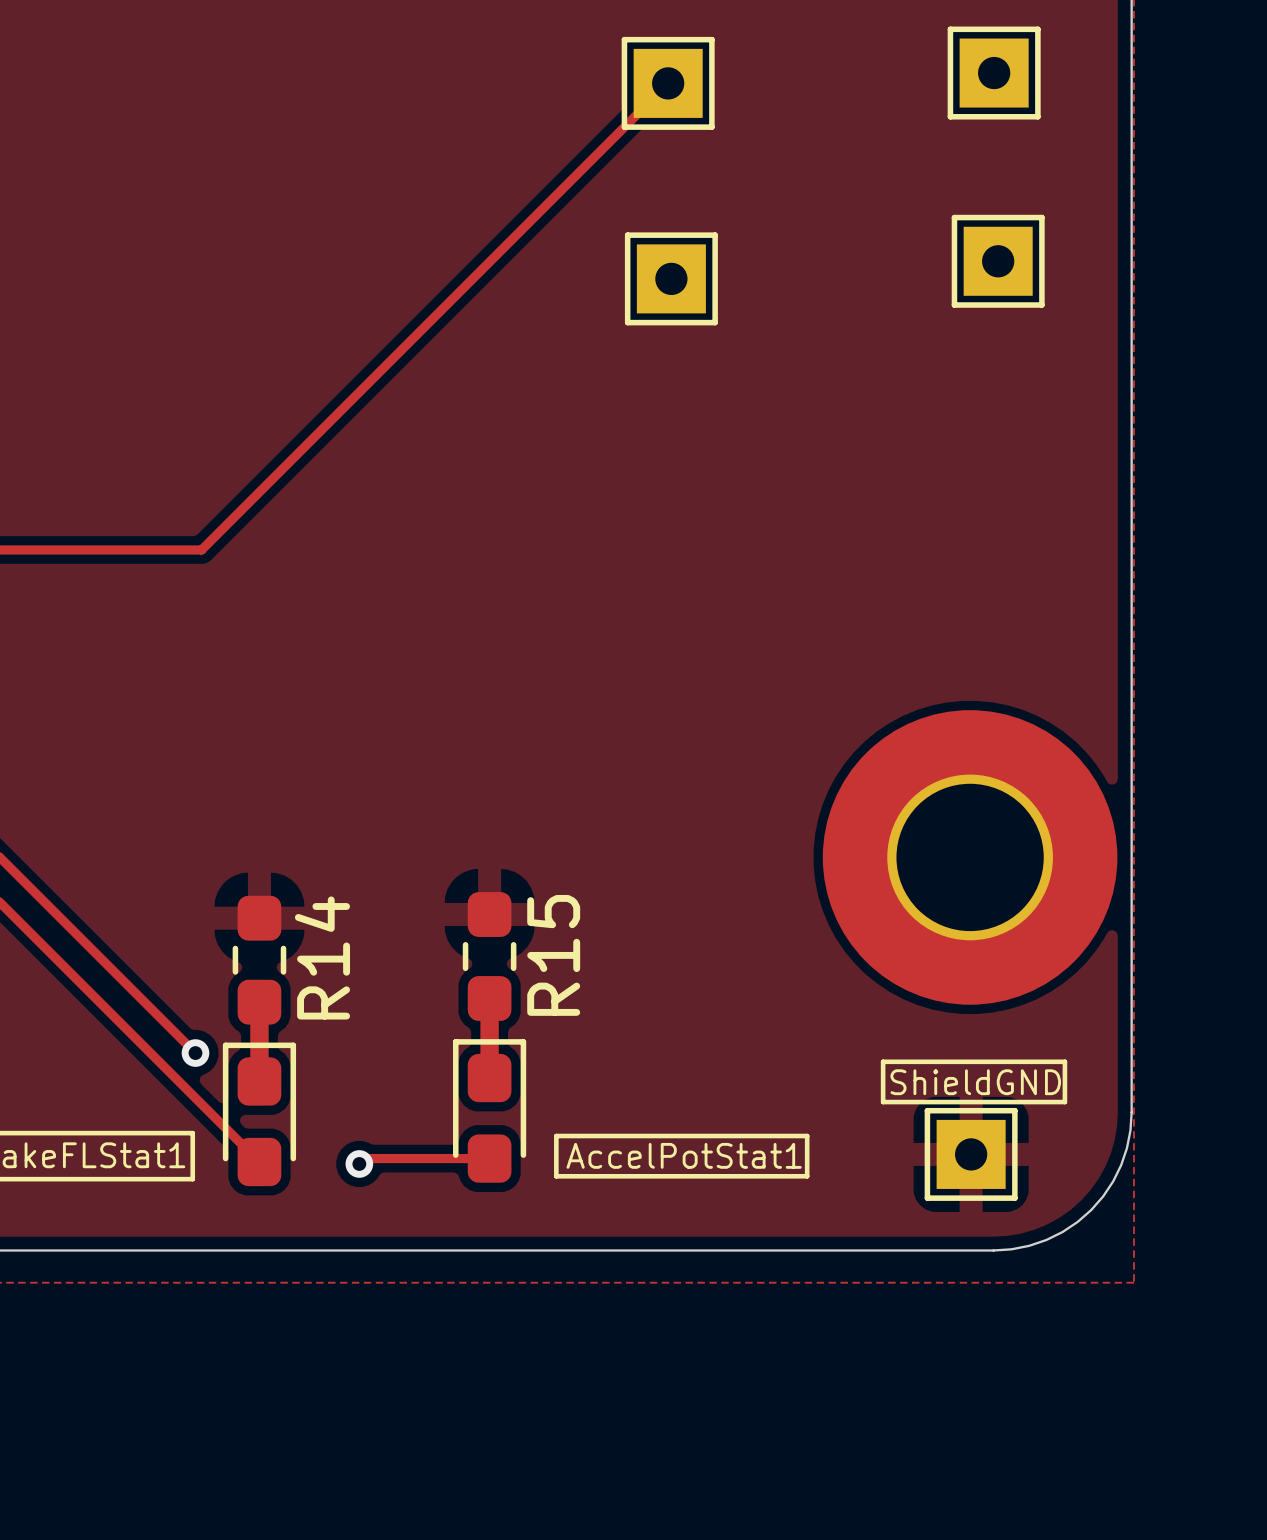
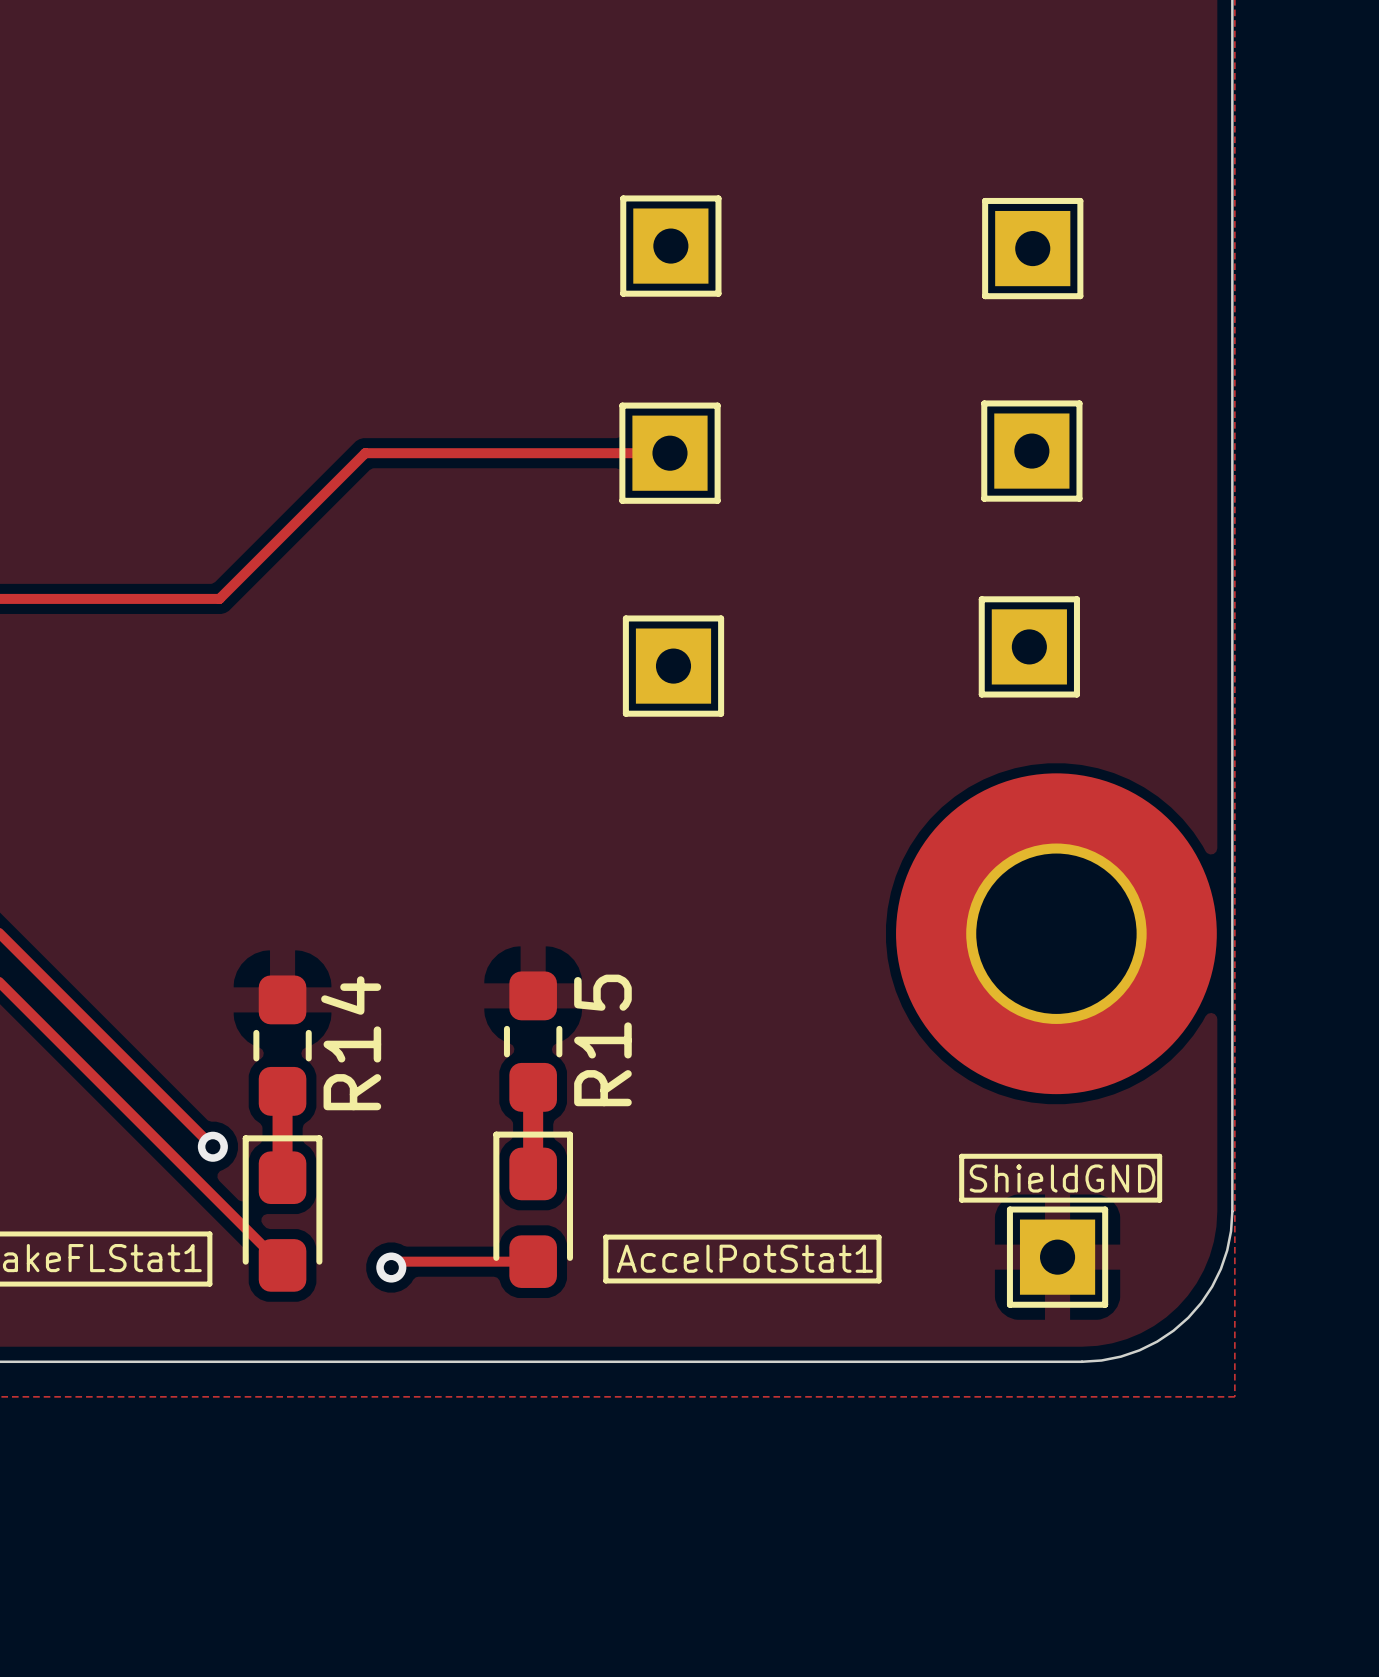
part: (994, 73) -> none
track: (668, 83) (335, 416) -> (669, 453) (365, 453)
part: (668, 83) -> none
part: none -> (670, 246)
part position: (998, 261) -> (1032, 248)
part: (671, 278) -> none
part: none -> (1031, 451)
part: none -> (669, 453)
part: none -> (1029, 646)
part: none -> (673, 666)

